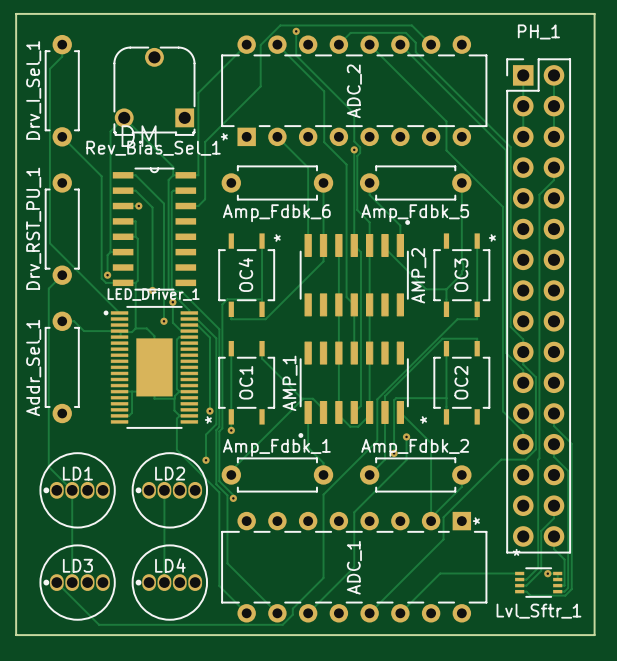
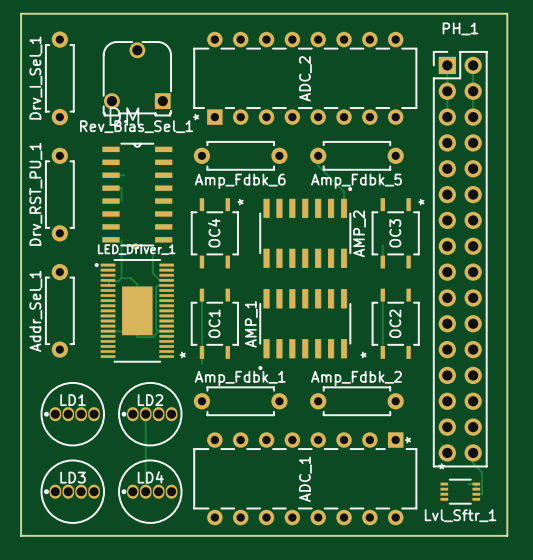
track: (296, 31) (296, 55) (354, 113) (354, 141) (360, 147) (360, 153) (357, 155) (357, 210) (369, 222) (369, 415) (358, 426) (350, 426) (338, 415) (338, 245) -> none
via: (296, 31) -> none
track: (62, 44) (62, 56) (49, 68) (49, 243) (119, 312) -> none
track: (246, 44) (198, 92) (198, 175) (173, 175) -> none
track: (277, 44) (324, 91) (324, 142) (346, 164) (346, 297) (354, 304) (354, 353) -> none
track: (338, 44) (350, 32) (405, 32) (415, 42) (415, 52) (510, 147) (510, 326) (523, 339) (523, 364) (535, 377) (535, 449) (525, 459) (501, 459) (443, 517) (443, 539) (369, 613) -> none
track: (369, 44) (446, 121) (446, 150) (502, 206) (502, 411) (523, 431) (523, 444) -> none
track: (400, 44) (505, 150) (505, 352) (523, 370) (523, 382) -> none
track: (431, 44) (411, 25) (280, 25) (260, 45) (260, 86) (205, 141) (205, 199) (198, 206) (185, 206) -> none
track: (62, 136) (101, 176) (101, 278) (106, 282) (135, 282) (137, 280) (137, 238) (135, 236) (123, 236) -> none
track: (277, 136) (308, 167) (308, 245) -> none
track: (354, 149) (354, 245) (360, 252) (360, 405) (354, 412) -> none
via: (354, 149) -> none
track: (553, 167) (553, 180) (539, 194) (538, 567) (526, 579) (519, 579) -> none
track: (123, 175) (135, 175) (164, 203) (164, 321) -> none
track: (173, 175) (173, 166) (124, 117) (110, 131) (110, 252) -> none
track: (173, 175) (168, 179) (168, 289) (189, 310) (189, 312) -> none
track: (323, 182) (323, 261) (265, 319) (231, 319) (231, 309) -> none
track: (461, 182) (463, 269) (461, 273) (446, 289) (426, 289) (384, 248) (384, 245) -> none
track: (123, 190) (135, 190) (152, 207) (152, 290) -> none
track: (185, 190) (171, 192) (171, 287) (175, 291) (181, 291) (219, 329) (219, 427) (216, 430) (216, 484) (227, 495) (227, 563) (277, 613) -> none
via: (138, 206) -> none
track: (262, 241) (262, 309) -> none
track: (477, 241) (477, 319) (457, 319) (377, 399) (377, 440) (323, 494) (323, 577) (292, 608) (292, 614) (282, 624) (99, 624) (56, 582) -> none
track: (110, 252) (107, 255) (107, 275) -> none
track: (62, 275) (48, 288) (48, 466) (72, 490) (72, 582) -> none
via: (107, 275) -> none
track: (262, 299) (227, 299) (222, 304) (222, 428) (219, 431) (219, 481) (233, 495) (233, 498) -> none
via: (172, 302) -> none
track: (189, 318) (196, 318) (216, 338) (216, 424) (206, 434) (206, 460) -> none
track: (62, 321) (74, 321) (84, 331) (120, 332) -> none
via: (164, 321) -> none
track: (189, 325) (197, 325) (209, 337) (209, 411) -> none
track: (262, 348) (262, 358) (302, 399) -> none
track: (477, 348) (477, 338) (442, 338) (384, 396) (384, 459) (369, 474) -> none
track: (132, 391) (132, 412) (129, 415) (119, 415) -> none
track: (174, 398) (174, 410) (179, 415) -> none
track: (446, 398) (396, 398) (394, 400) (394, 453) -> none
via: (209, 411) -> none
track: (308, 412) (308, 447) (323, 463) (323, 474) -> none
track: (323, 412) (323, 409) (312, 398) (303, 398) (231, 470) (231, 474) -> none
track: (400, 412) (431, 443) (431, 521) -> none
track: (553, 413) (553, 426) (571, 443) (571, 589) (565, 595) (530, 595) (526, 591) (519, 591) -> none
track: (179, 415) (176, 418) (176, 449) (219, 492) (219, 585) (246, 613) -> none
via: (231, 430) -> none
track: (406, 436) (406, 460) (354, 512) (354, 567) (308, 613) -> none
via: (406, 436) -> none
track: (553, 444) (553, 456) (568, 470) (568, 588) (564, 591) (557, 591) -> none
via: (394, 453) -> none
via: (206, 460) -> none
track: (461, 474) (461, 486) (431, 517) -> none
via: (233, 498) -> none
track: (553, 505) (553, 518) (541, 531) (541, 570) (526, 585) (519, 585) -> none
track: (519, 573) (440, 573) (400, 613) -> none
via: (547, 573) -> none

